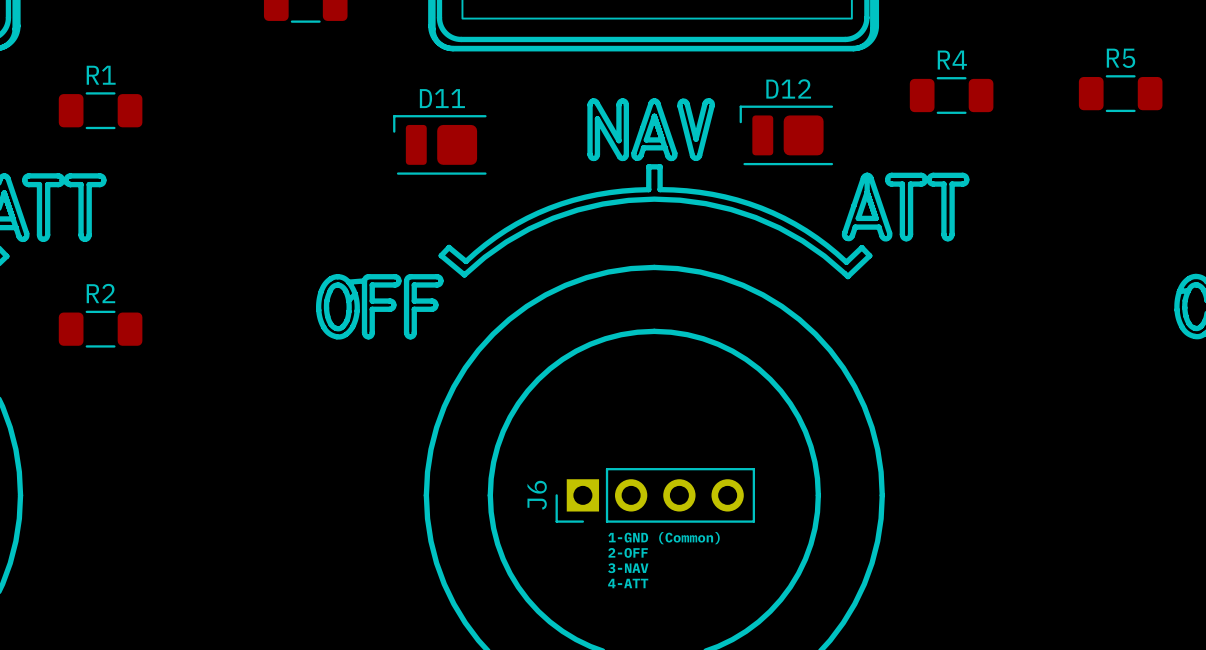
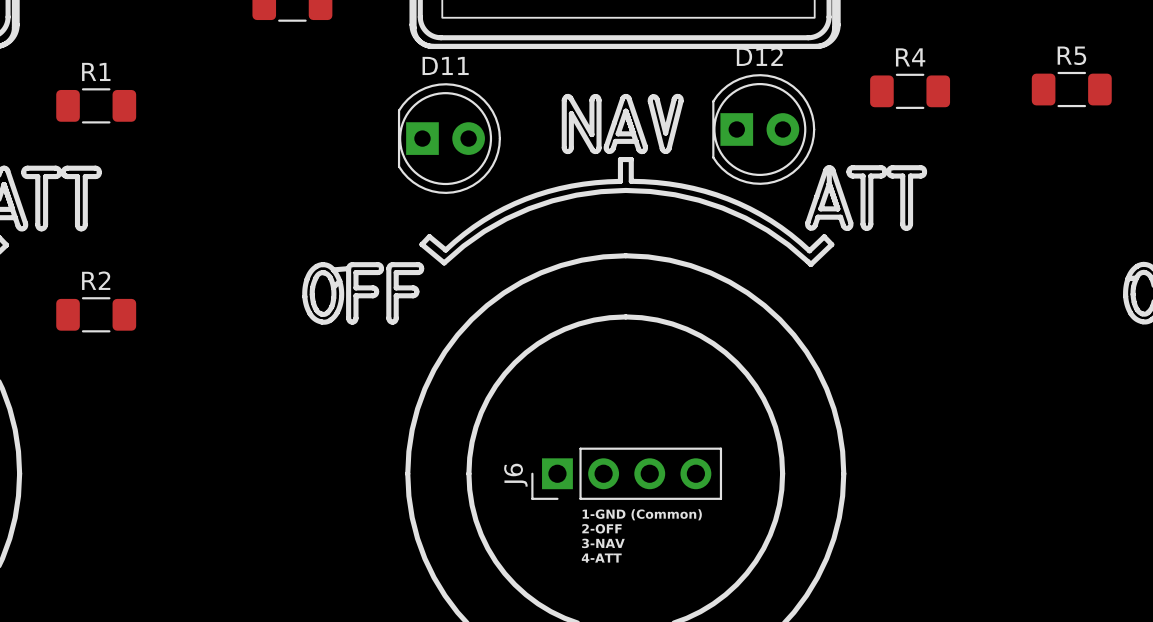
D12 footprint: [739, 105, 834, 166] -> [712, 74, 816, 185]
D11 footprint: [393, 115, 487, 175] -> [397, 83, 501, 194]

